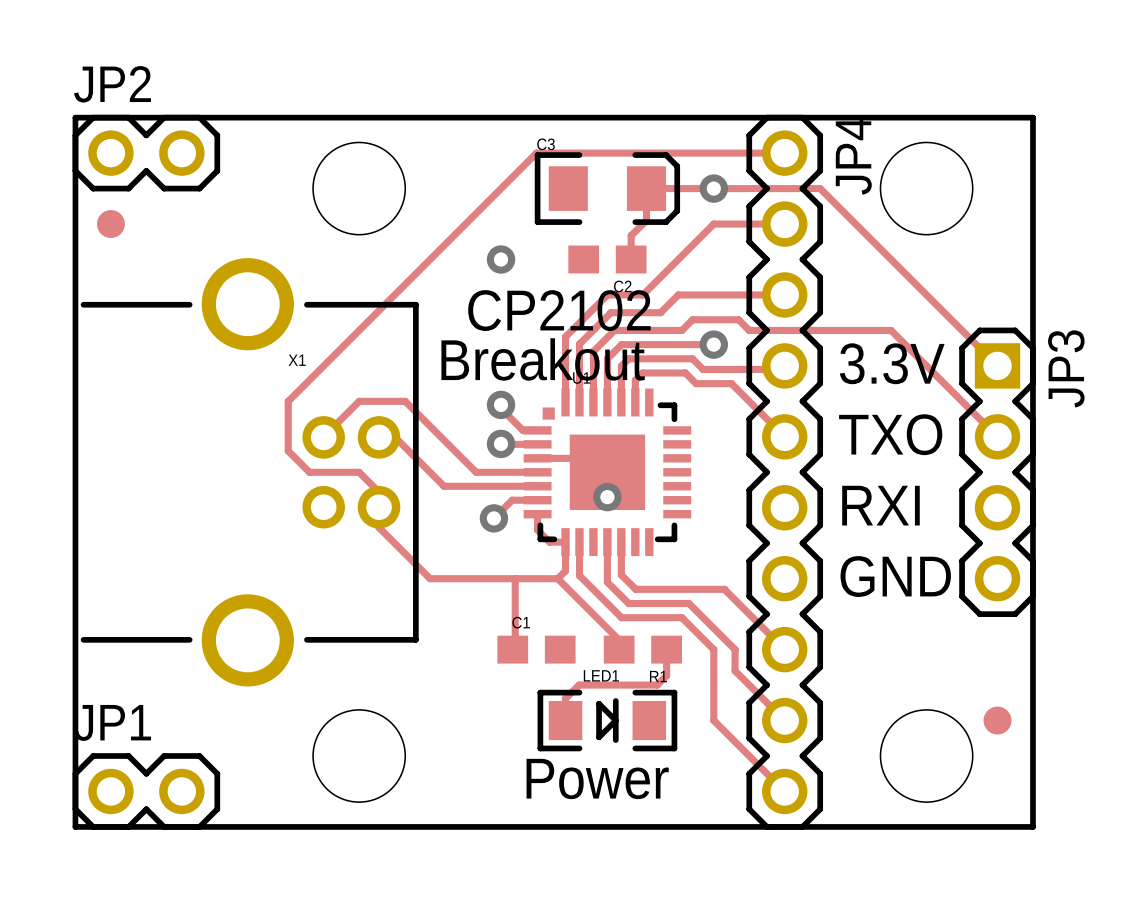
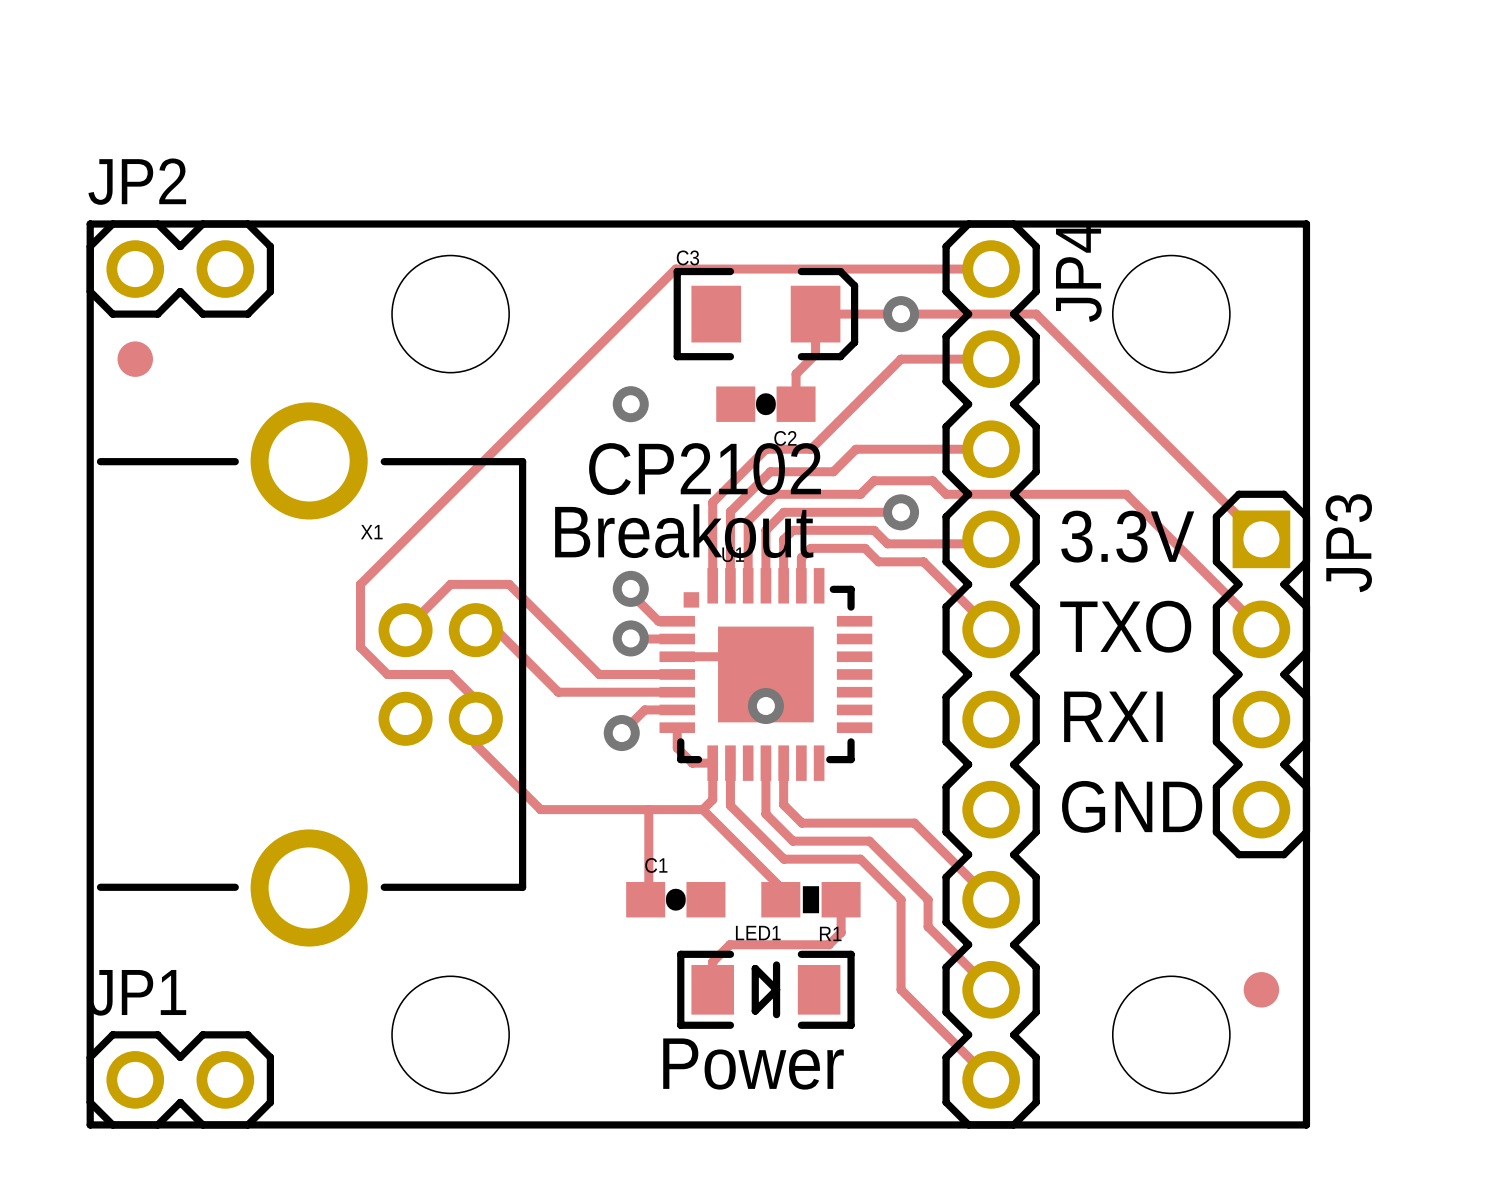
C2 footprint: [568, 245, 647, 274] -> [716, 386, 816, 422]
C1 footprint: [497, 635, 576, 664] -> [626, 881, 726, 918]
R1 footprint: [603, 635, 682, 664] -> [761, 881, 861, 918]

